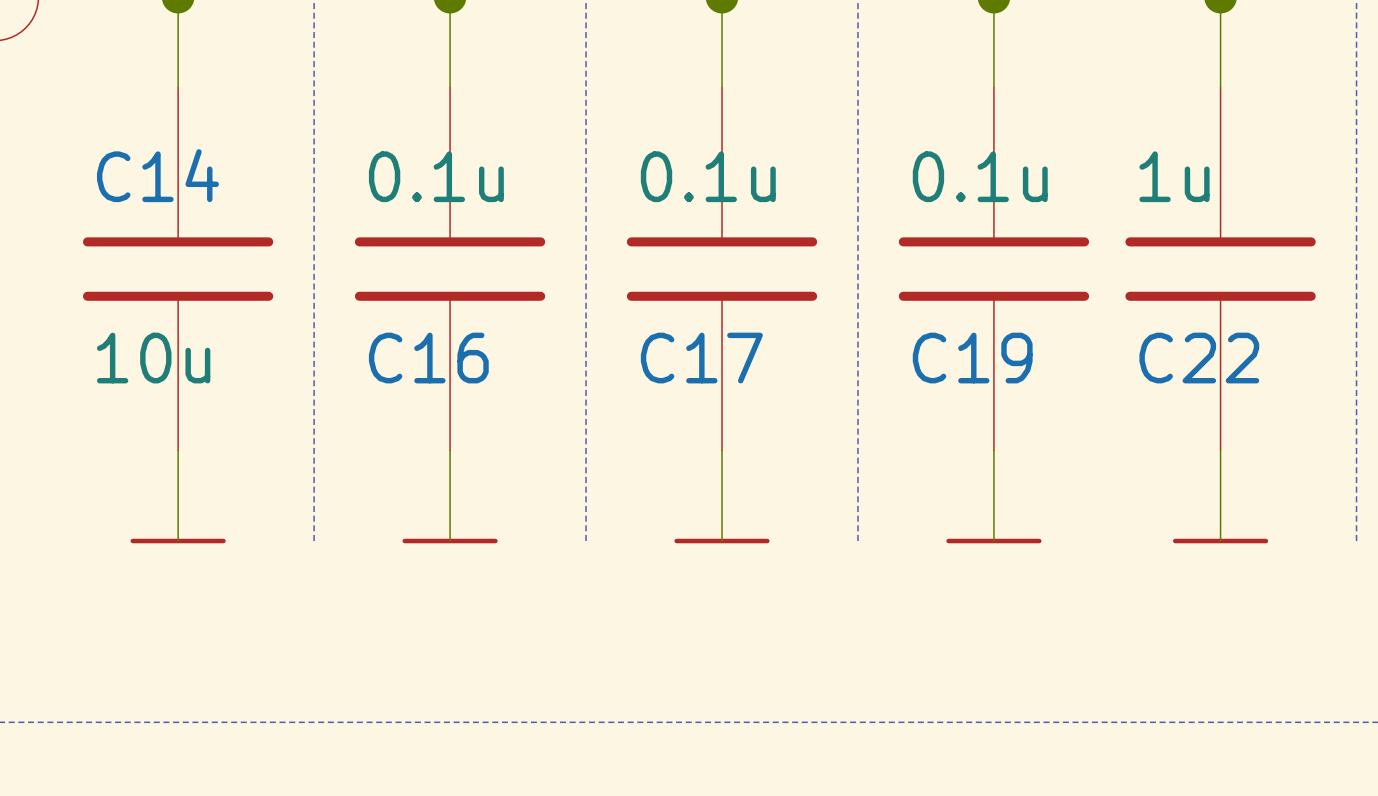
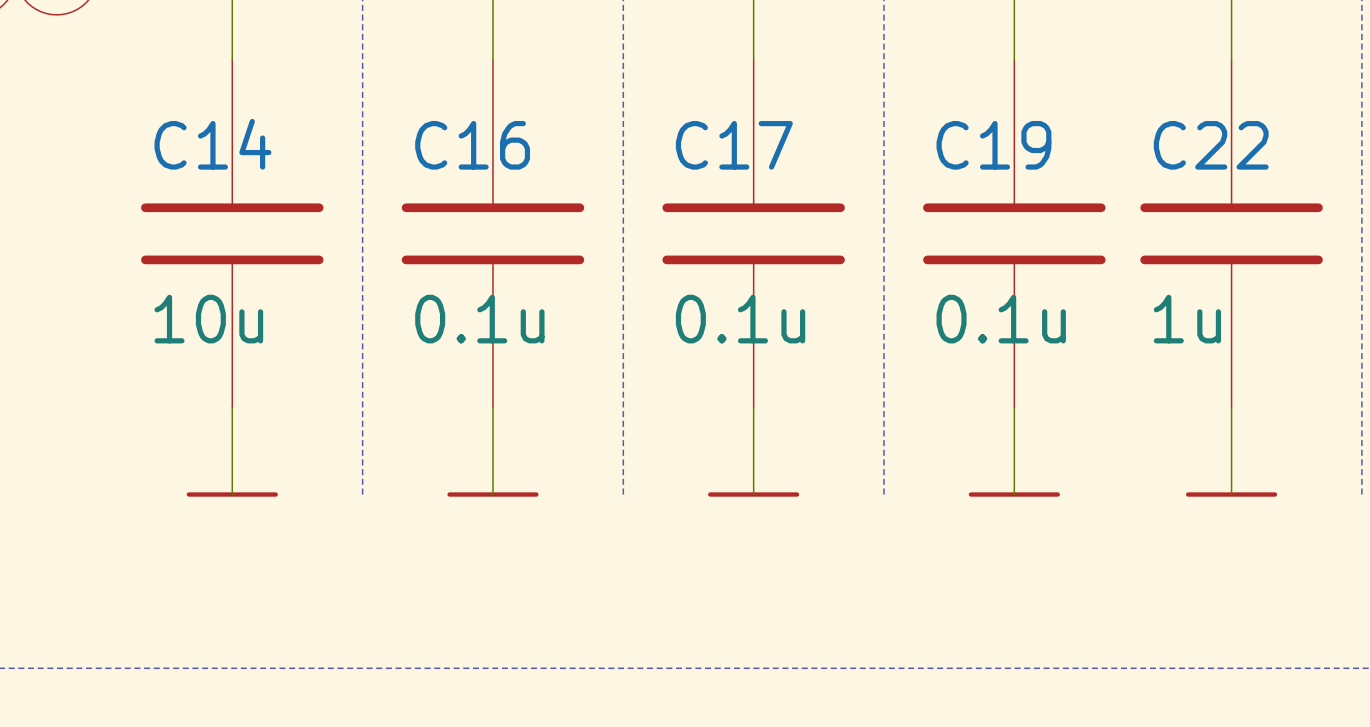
C16 value position: 0.1u (436, 176) -> 0.1u (479, 319)
C17 value position: 0.1u (708, 176) -> 0.1u (740, 319)
C19 value position: 0.1u (980, 176) -> 0.1u (1001, 319)
C22 value position: 1u (1174, 176) -> 1u (1187, 319)
C16 name position: C16 (428, 358) -> C16 (472, 145)
C17 name position: C17 (701, 358) -> C17 (734, 145)
C19 name position: C19 (972, 358) -> C19 (993, 145)
C22 name position: C22 (1199, 358) -> C22 (1211, 145)

